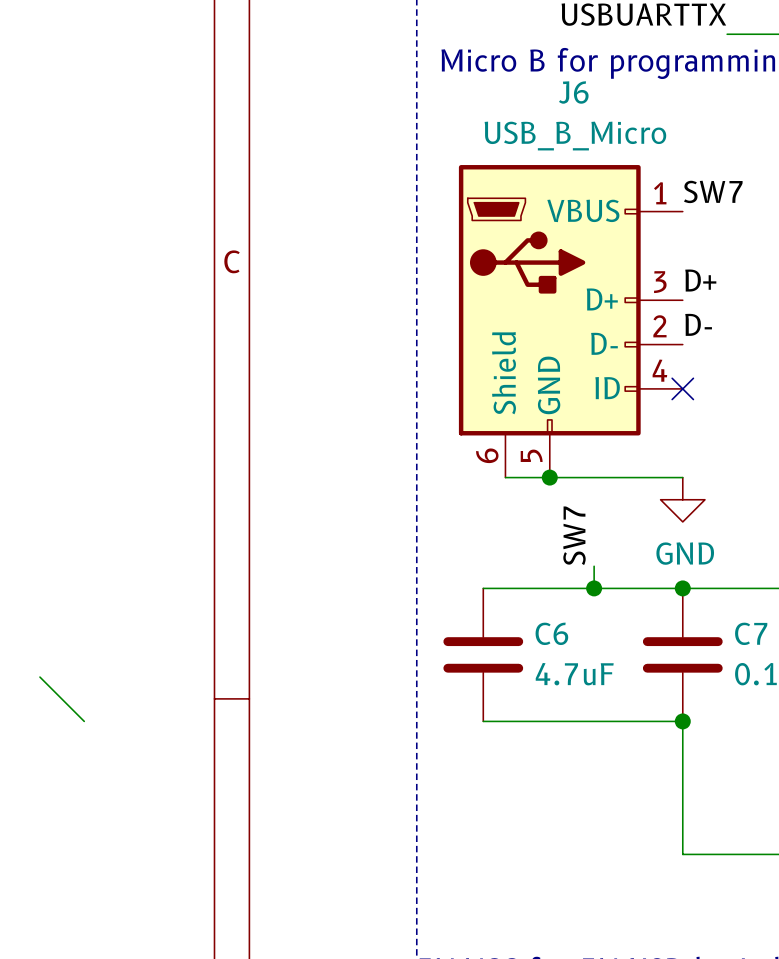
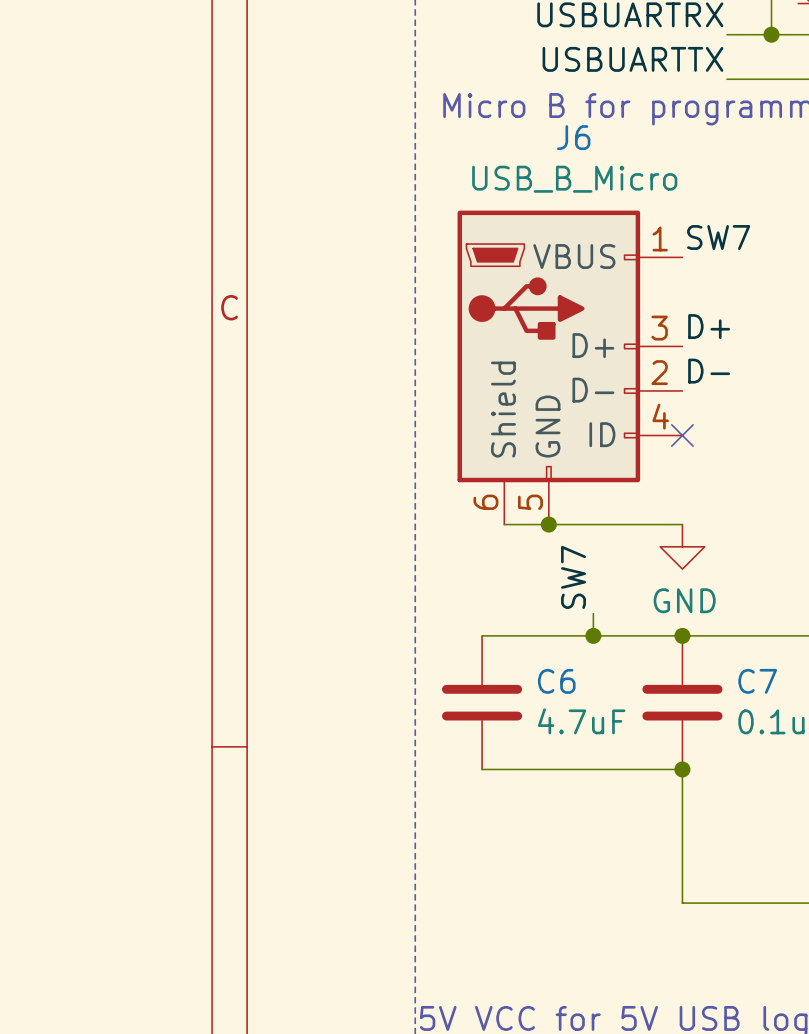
wire: (39, 677) (84, 721) -> none

